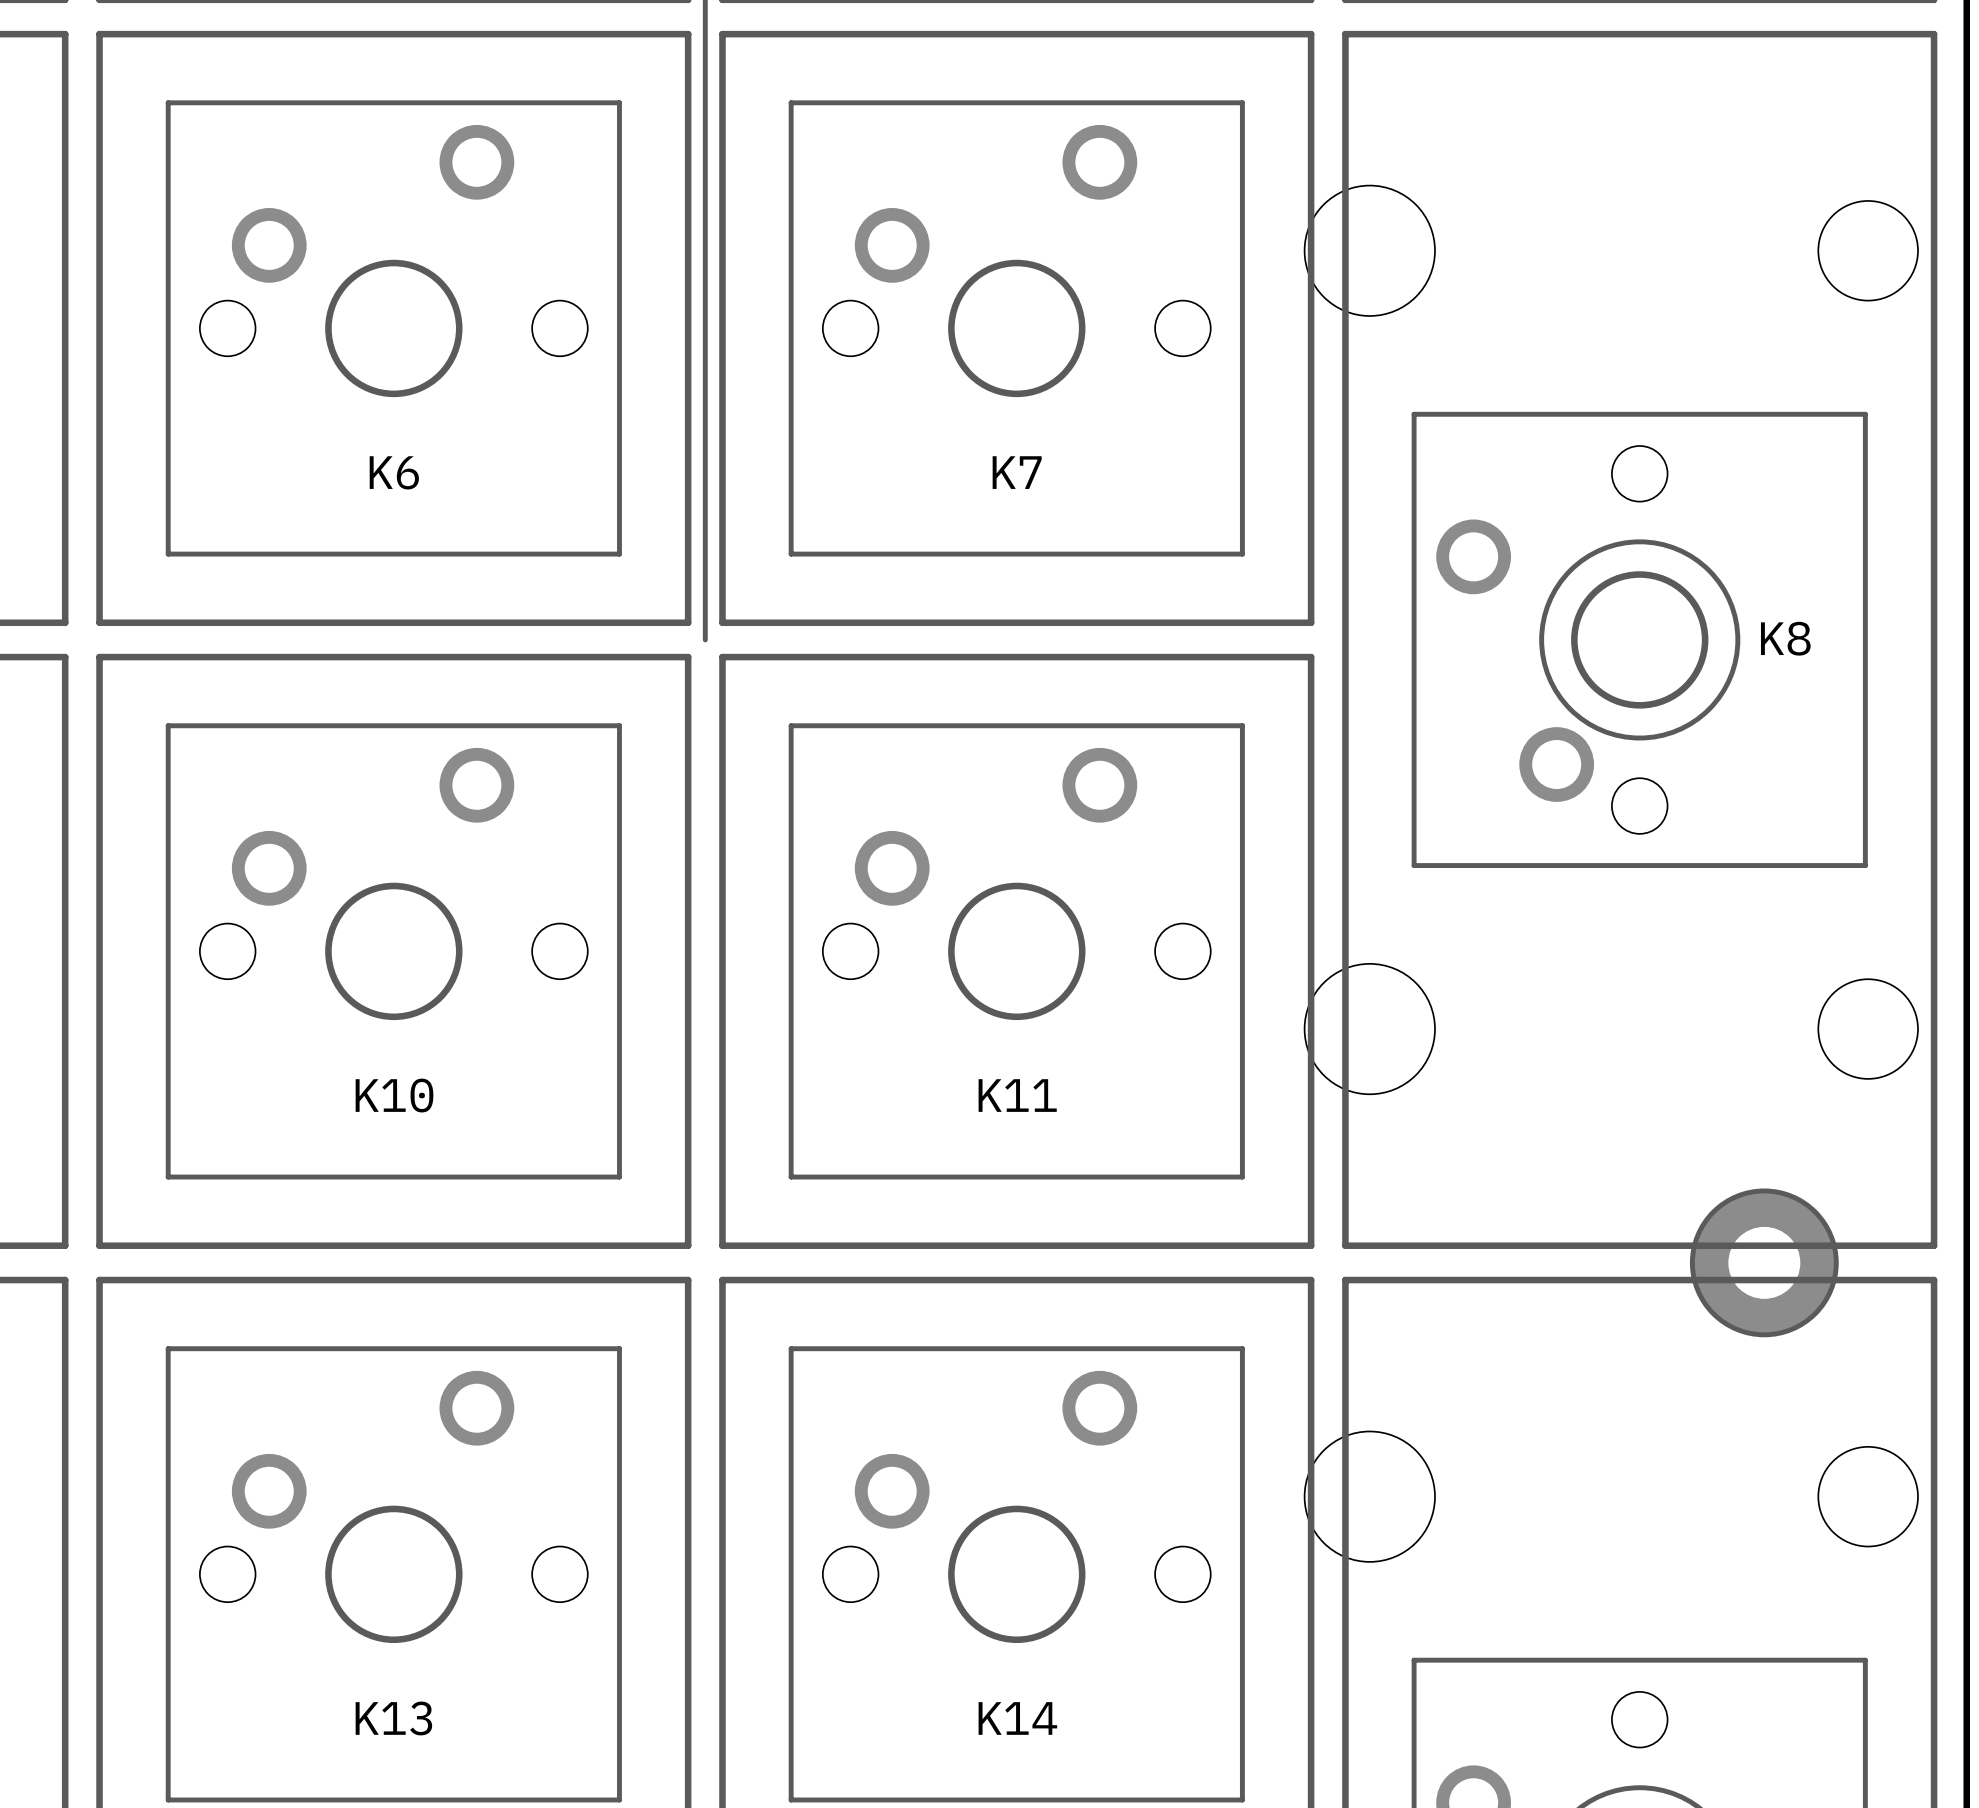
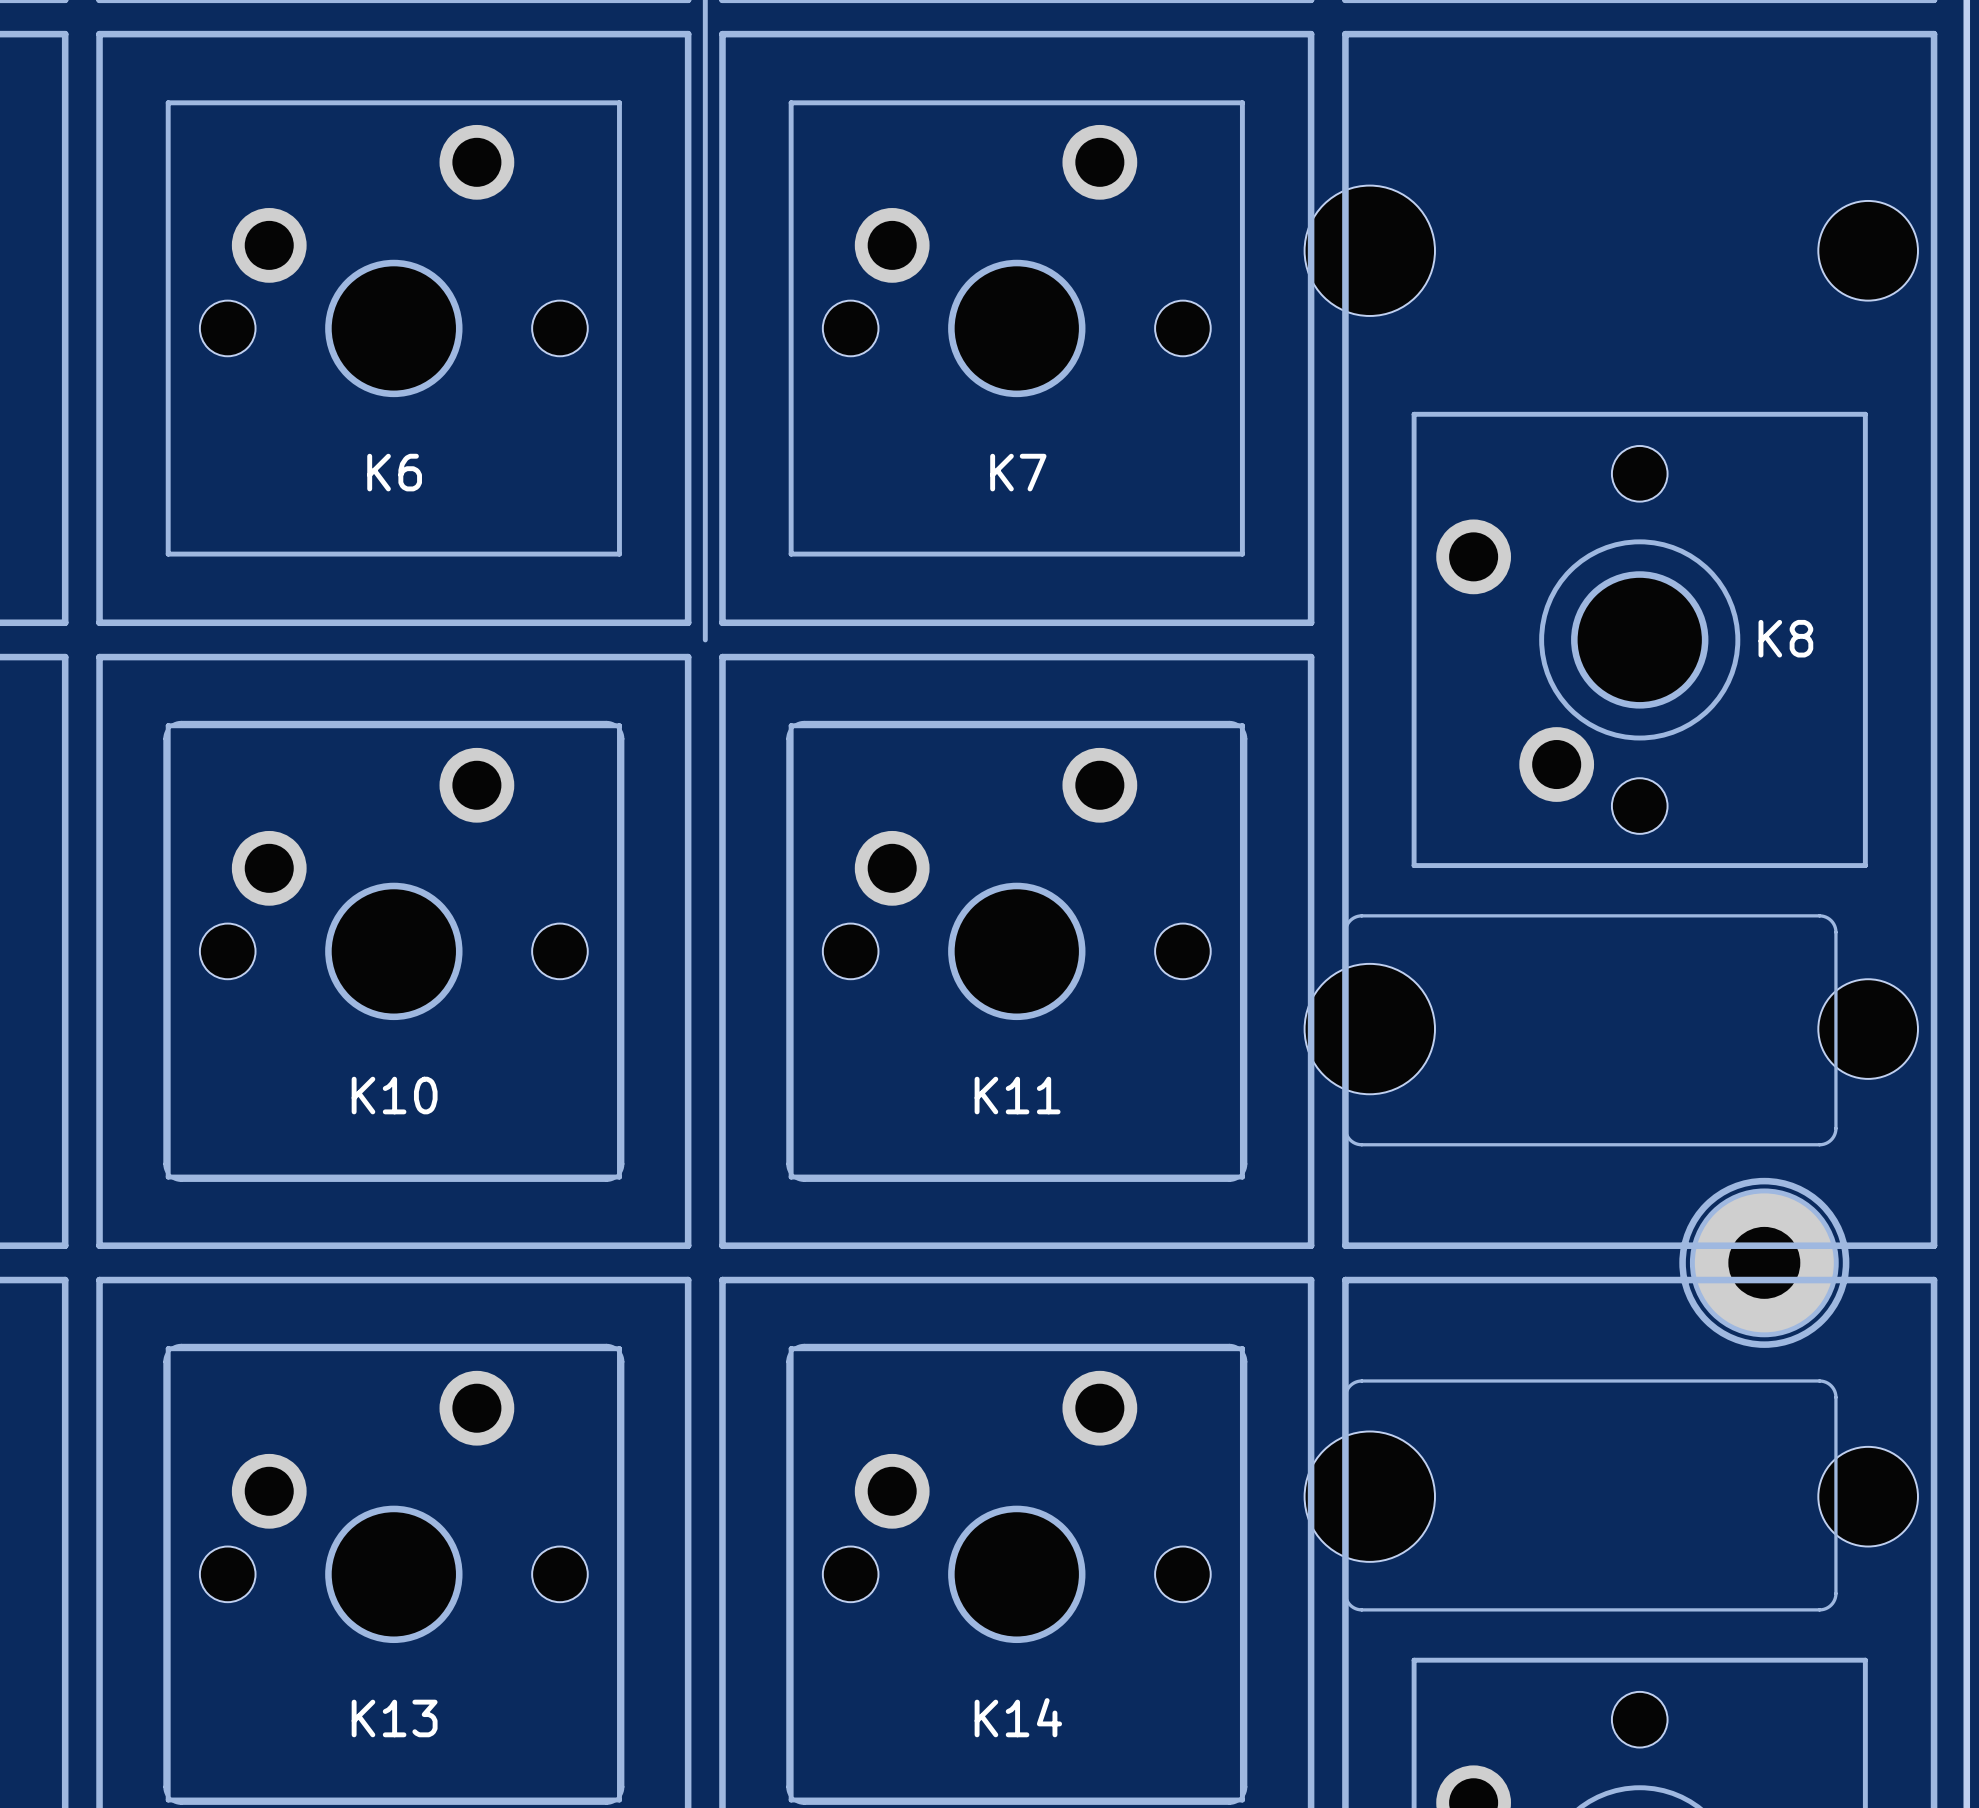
line: none -> (181, 722) (606, 722) (617, 727) (622, 738) (622, 1163) (617, 1175) (606, 1180) (181, 1180) (169, 1175) (164, 1163) (164, 738) (169, 727) (181, 722)
line: none -> (804, 722) (1229, 722) (1240, 727) (1245, 738) (1245, 1163) (1240, 1175) (1229, 1180) (804, 1180) (792, 1175) (787, 1163) (787, 738) (792, 727) (804, 722)
line: none -> (1361, 915) (1825, 917) (1833, 924) (1835, 932) (1834, 1134) (1827, 1142) (1819, 1144) (1355, 1143) (1348, 1138) (1345, 1128) (1345, 932) (1350, 920) (1361, 915)
drawing: none -> [1679, 1177, 1850, 1348]
line: none -> (181, 1345) (606, 1345) (617, 1350) (622, 1361) (622, 1786) (617, 1798) (606, 1803) (181, 1803) (169, 1798) (164, 1786) (164, 1361) (169, 1350) (181, 1345)
line: none -> (804, 1345) (1229, 1345) (1240, 1350) (1245, 1361) (1245, 1786) (1240, 1798) (1229, 1803) (804, 1803) (792, 1798) (787, 1786) (787, 1361) (792, 1350) (804, 1345)
line: none -> (1361, 1380) (1825, 1382) (1833, 1389) (1835, 1397) (1834, 1599) (1829, 1606) (1819, 1609) (1355, 1608) (1347, 1601) (1345, 1593) (1345, 1397) (1350, 1385) (1361, 1380)

